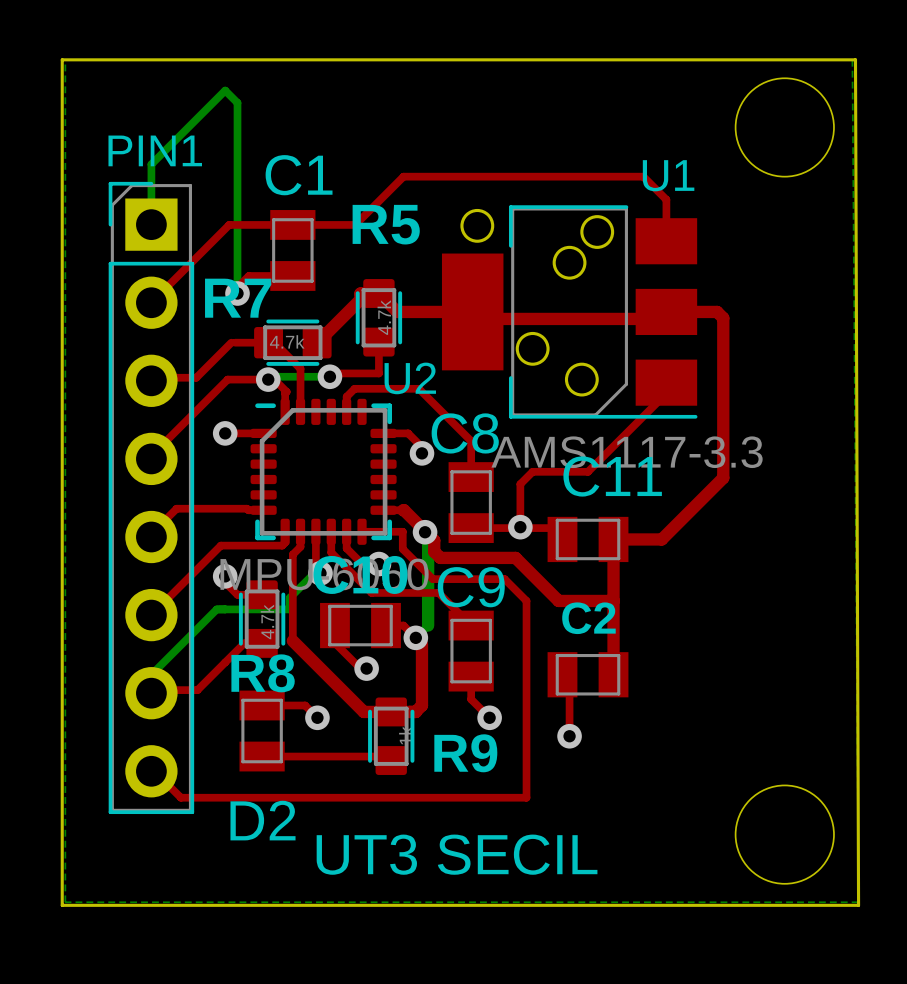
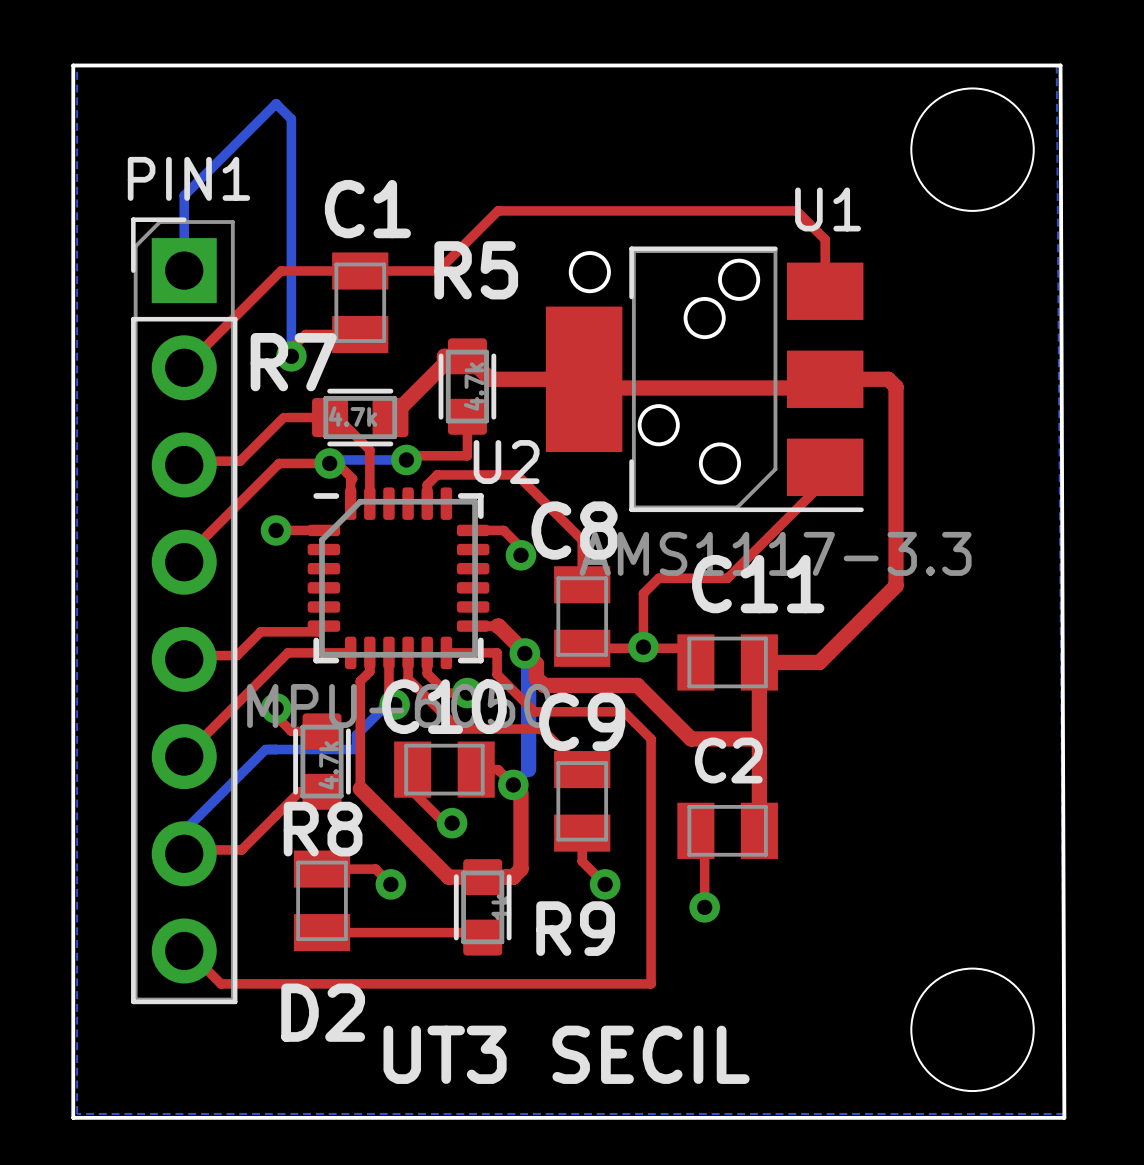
top track: (263, 510) (176, 508) (151, 533) -> (323, 626) (318, 631) (260, 631) (237, 655) (184, 655)
top track: (285, 531) (285, 542) (282, 545) (220, 545) -> (350, 652) (287, 652) (270, 670)

